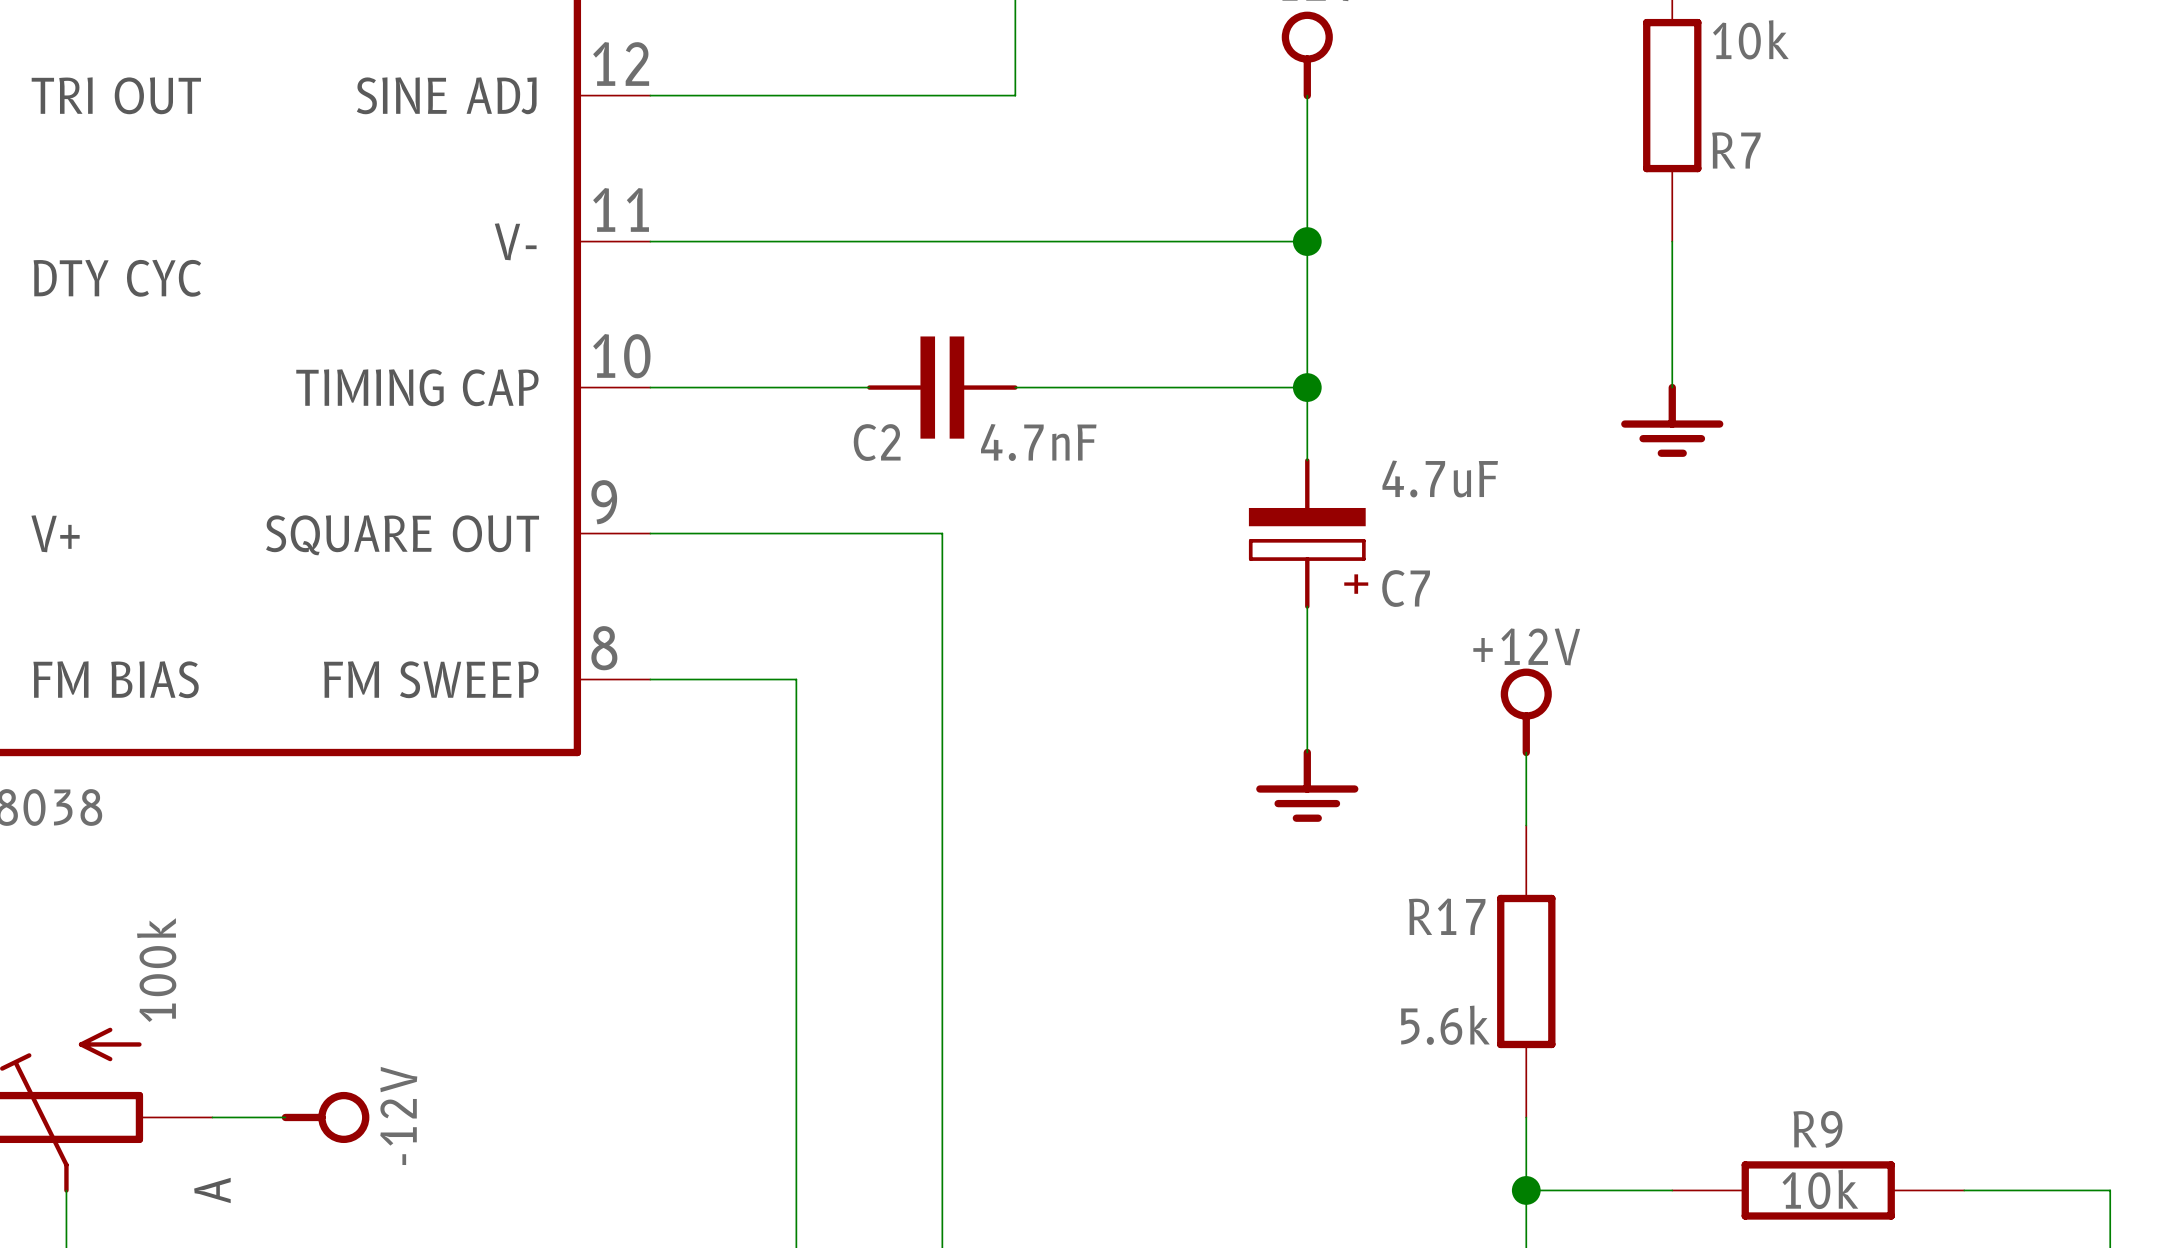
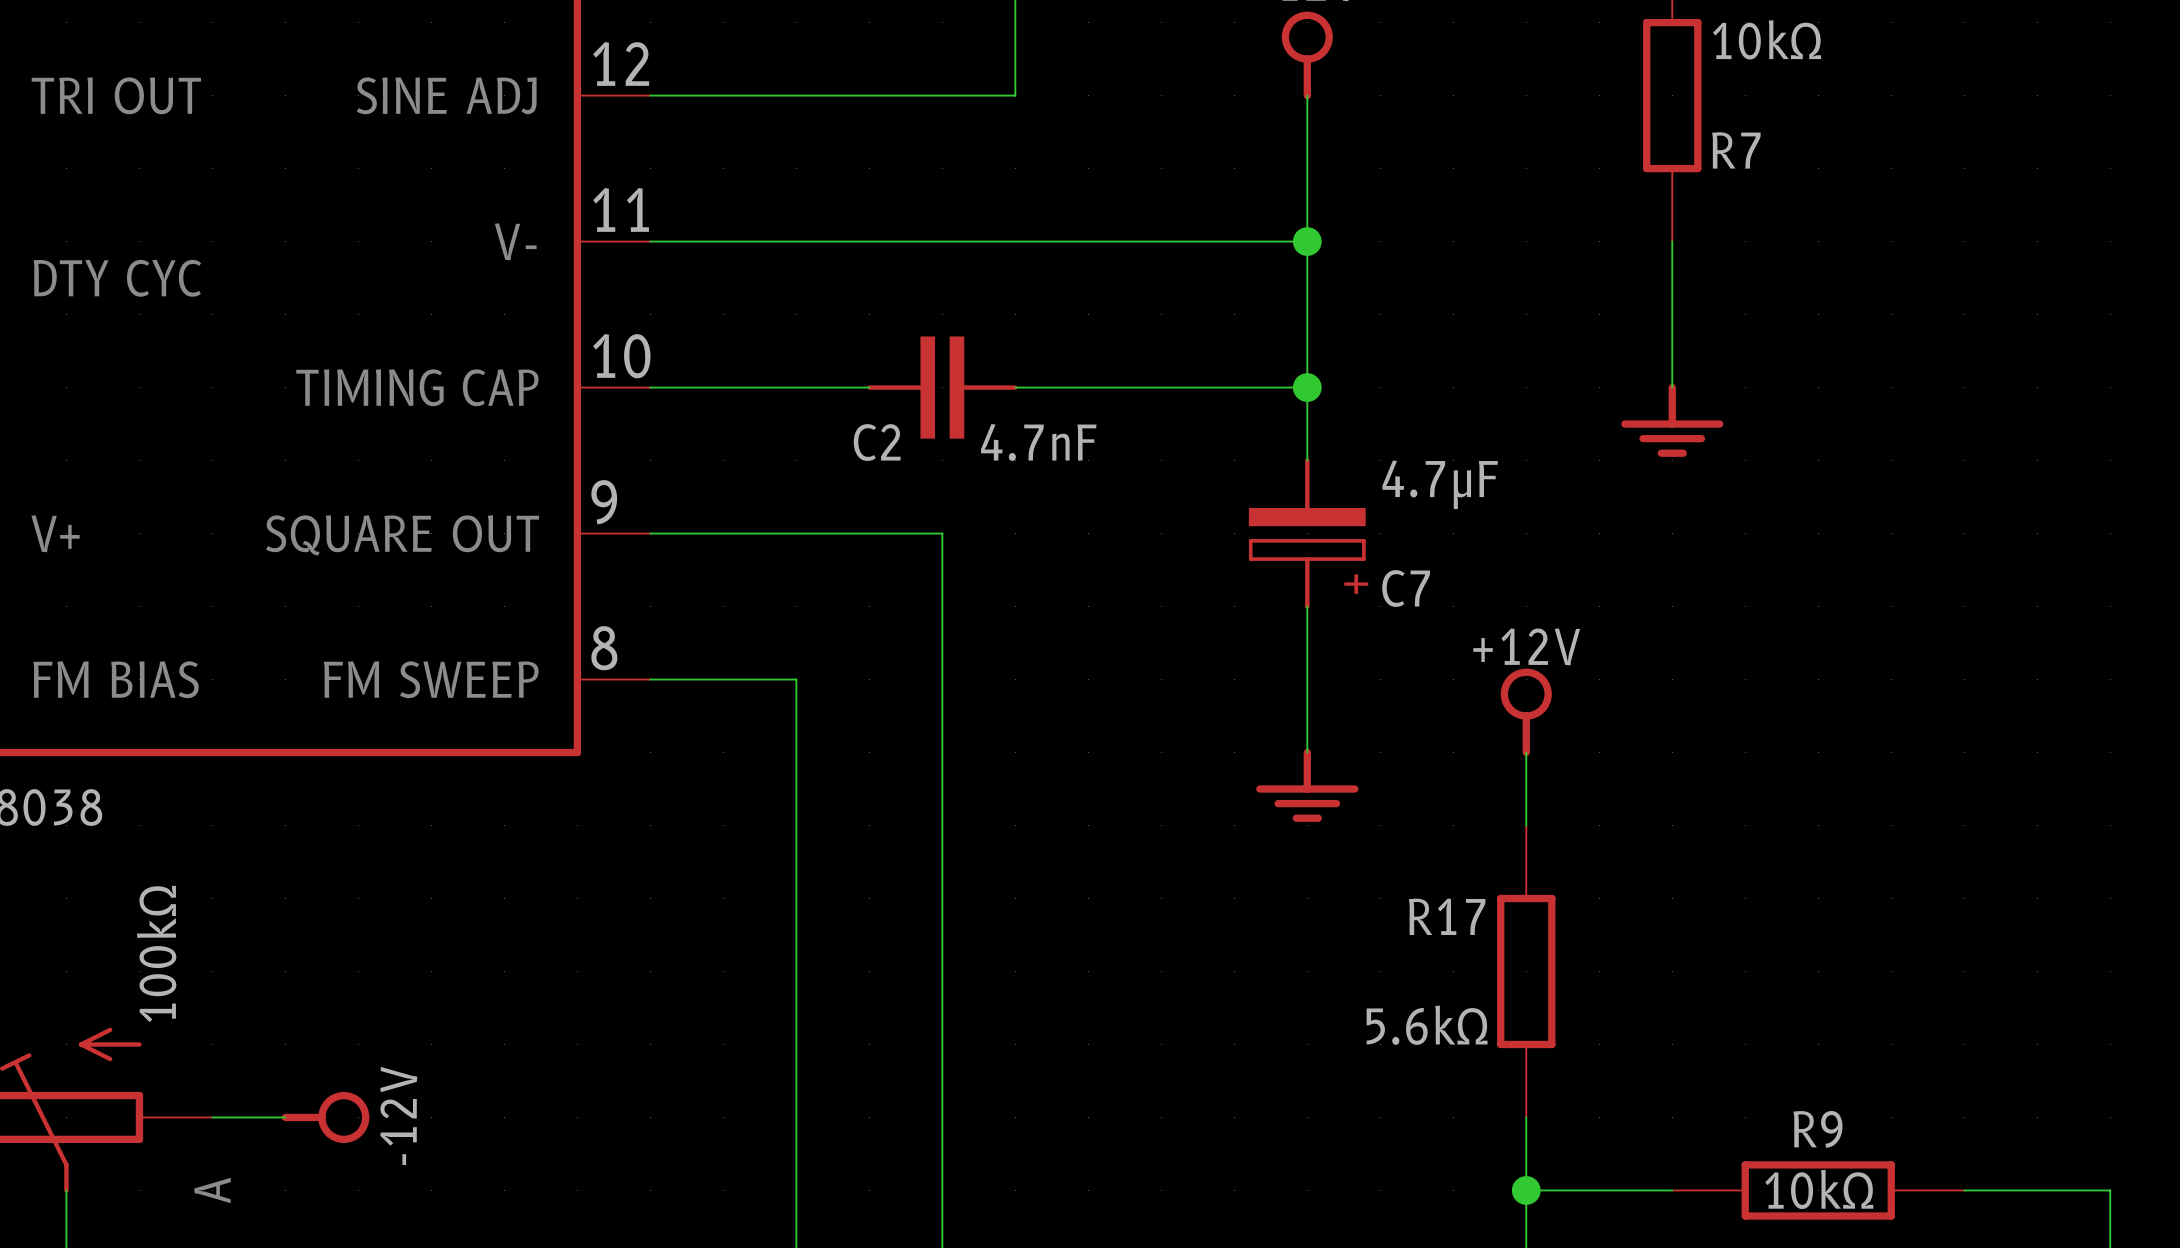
R7 value: 10k (1750, 39) -> 10kΩ (1767, 39)
C7 value: 4.7uF (1440, 478) -> 4.7μF (1440, 484)
part value: 100k (156, 970) -> 100kΩ (156, 953)
R17 value: 5.6k (1445, 1025) -> 5.6kΩ (1427, 1025)
R9 value: 10k (1820, 1189) -> 10kΩ (1819, 1189)

